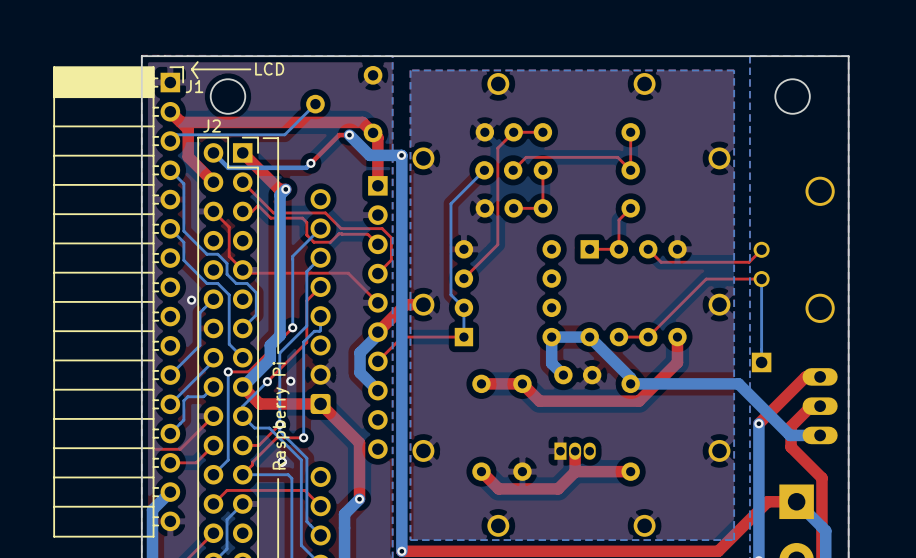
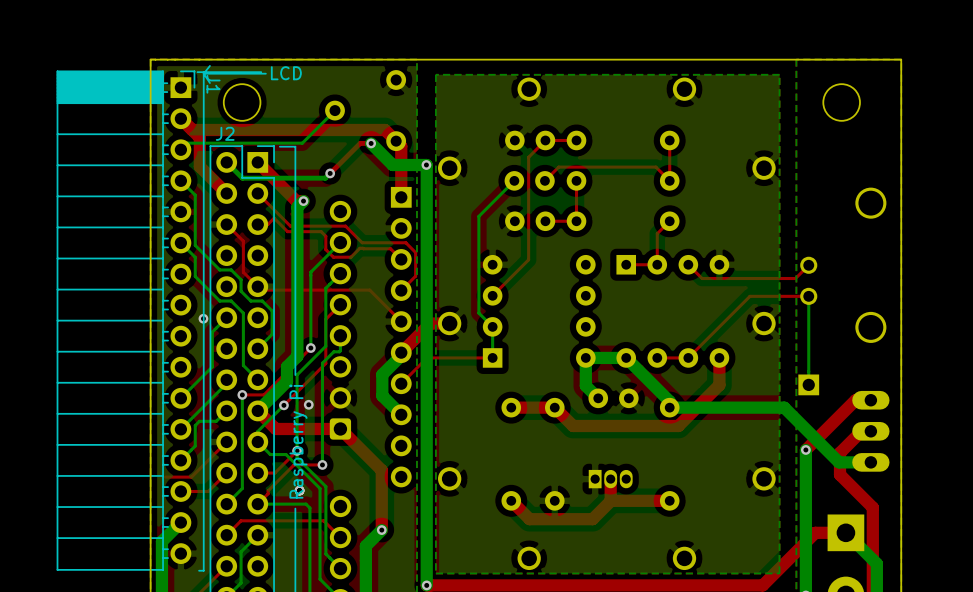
line: none -> (203, 72) (203, 570) (199, 570)
line: none -> (261, 72) (197, 72)
J1 name rotation: 0° (194, 86) -> 90° clockwise (213, 84)

